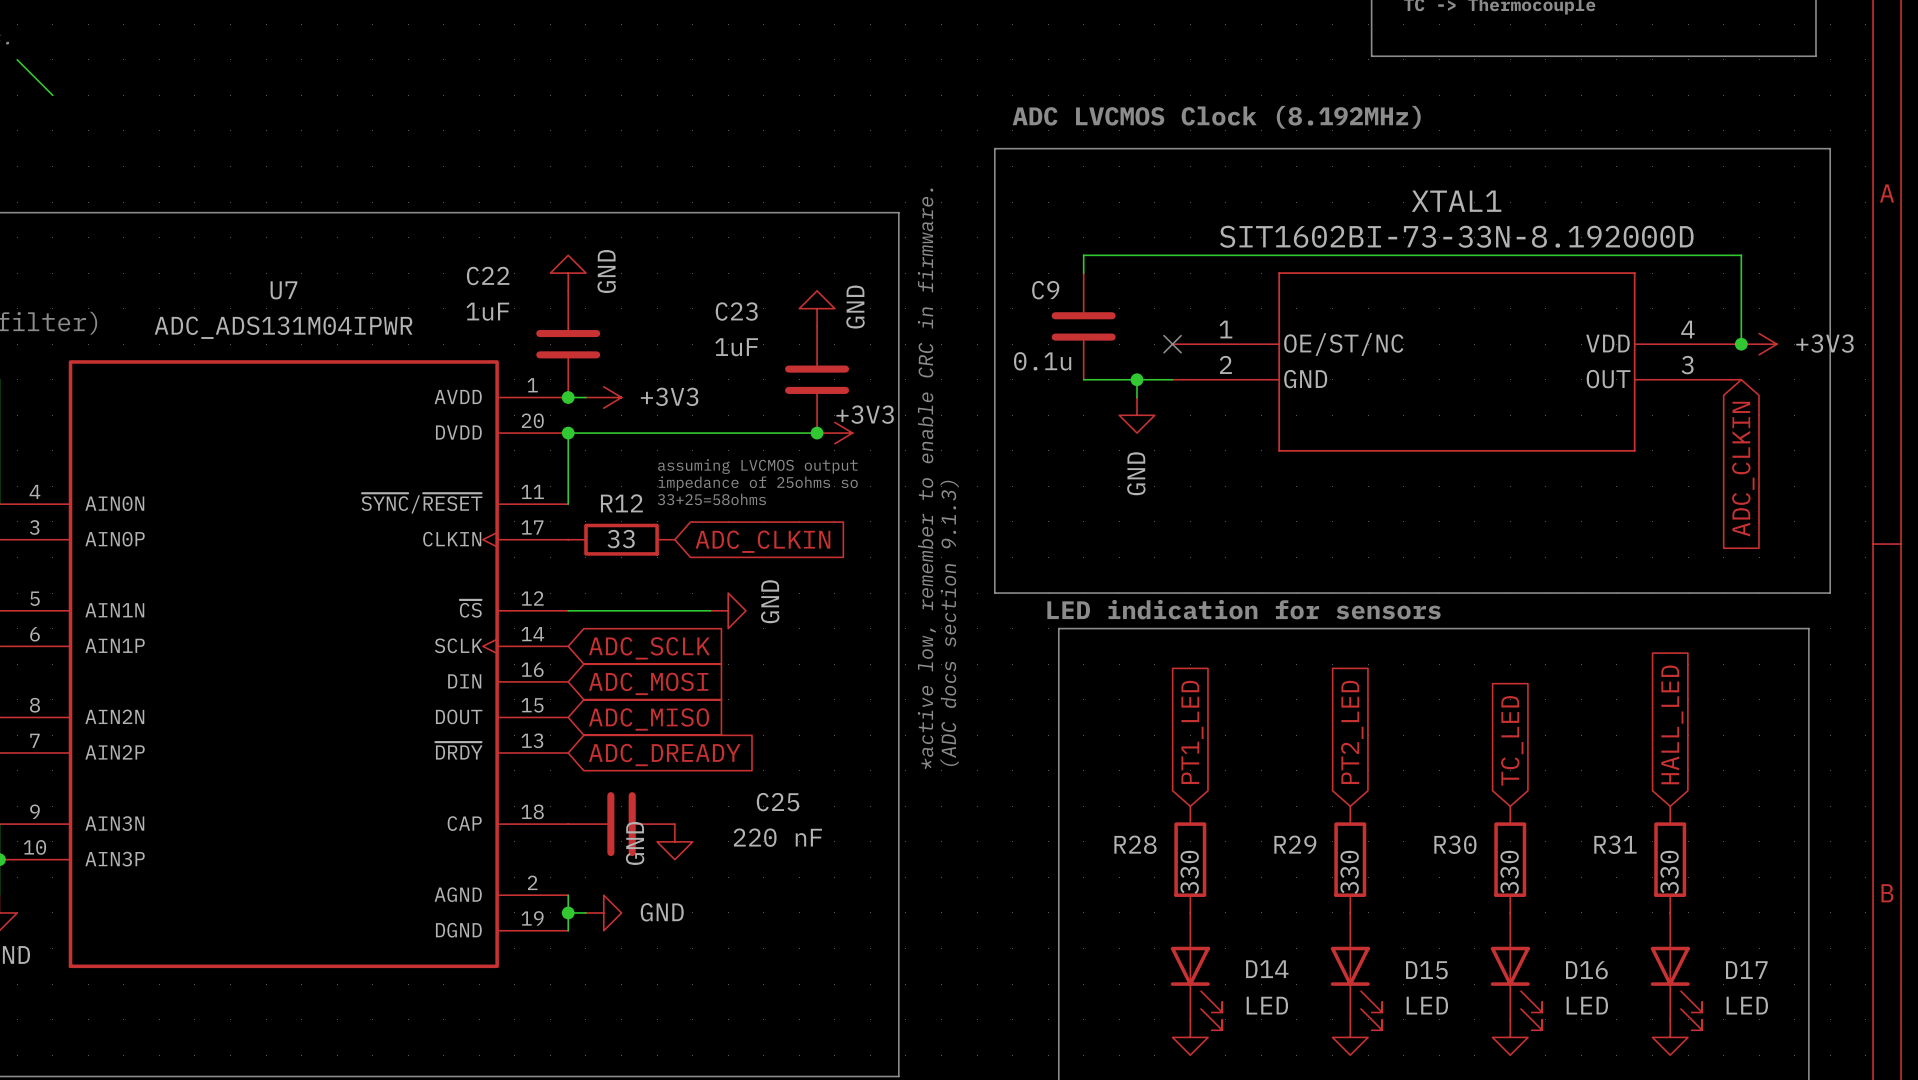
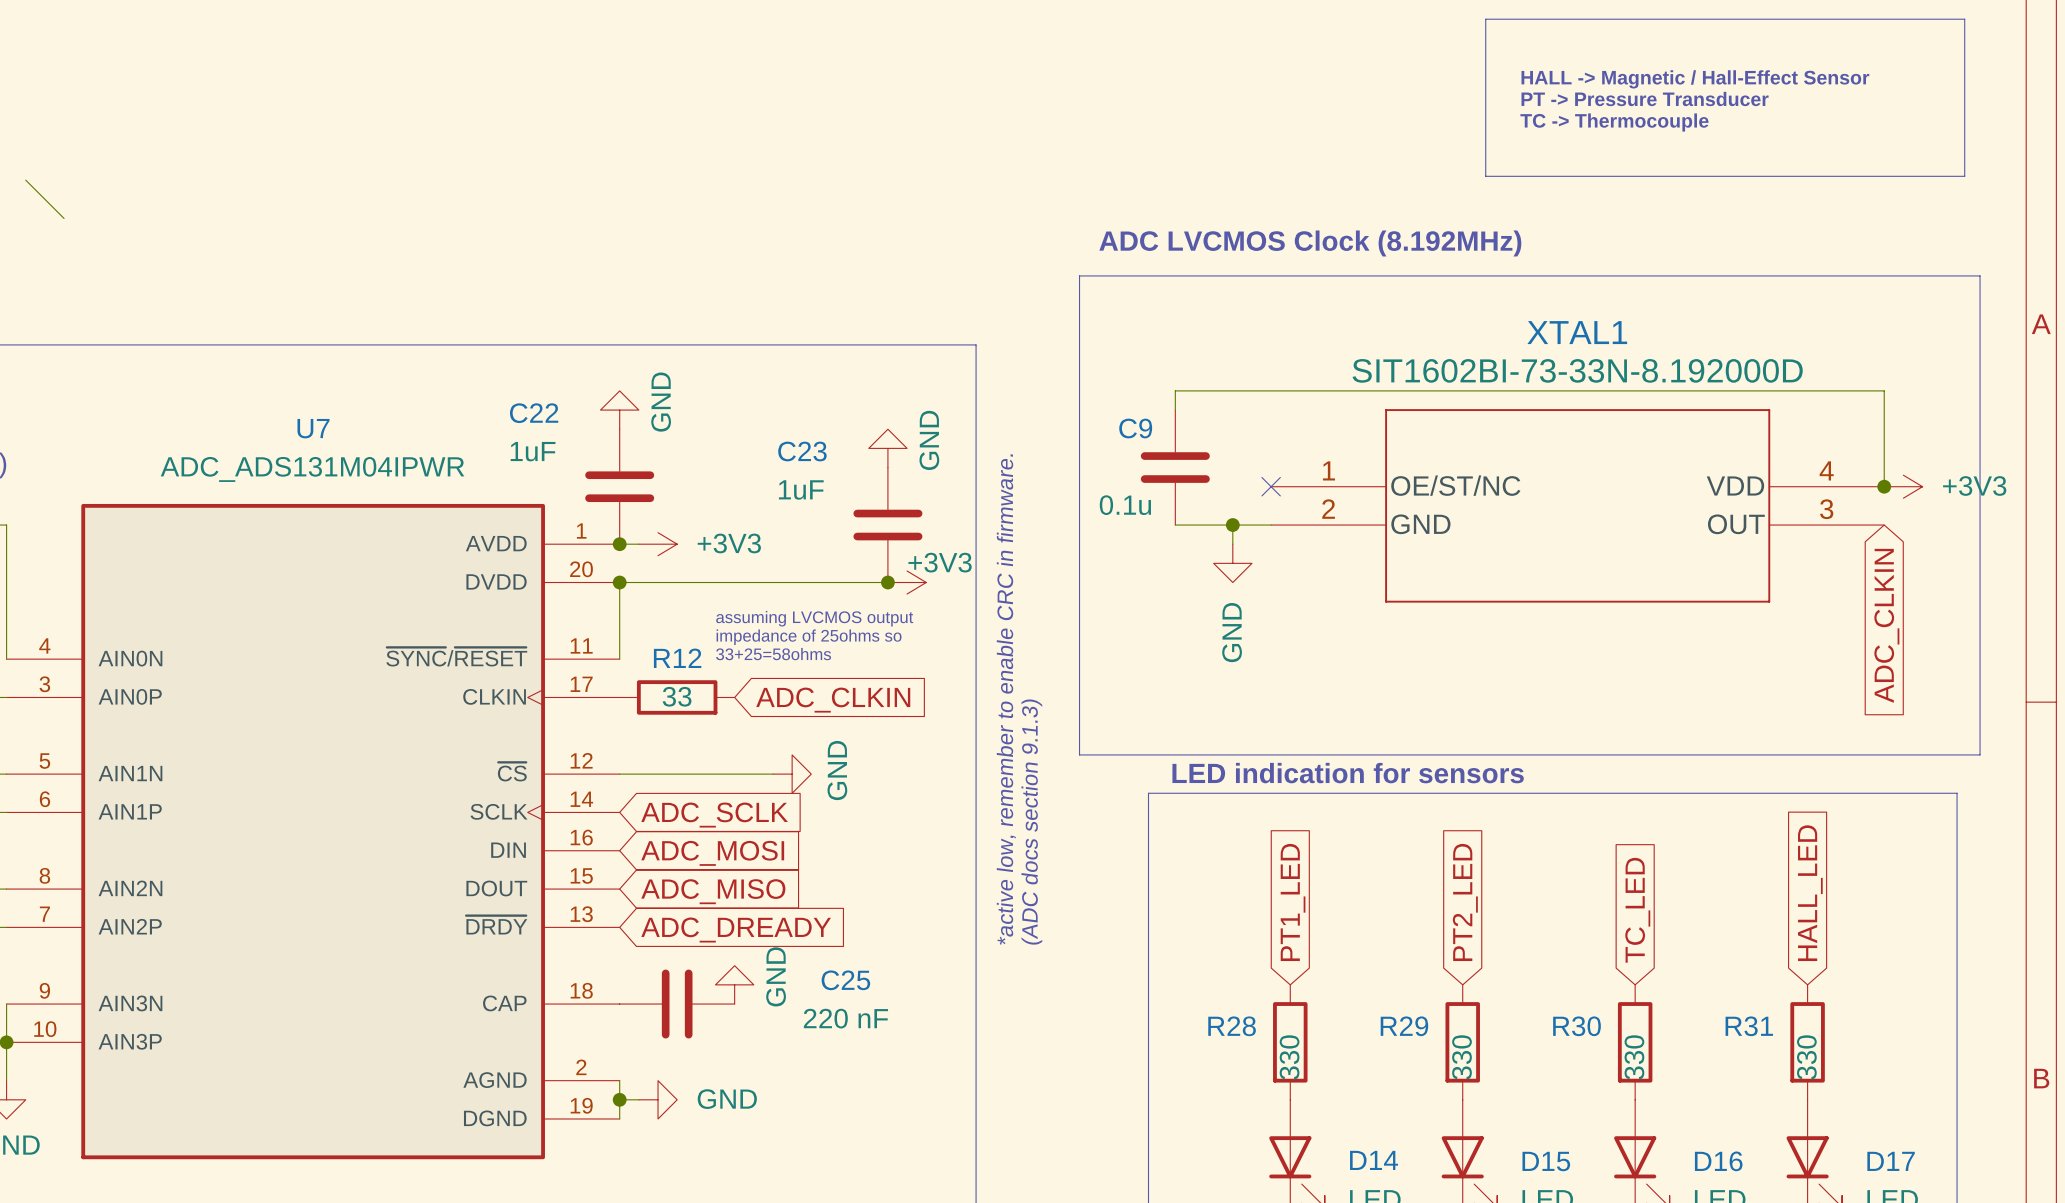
power symbol rotation: 0° (674, 841) -> 180° (734, 984)
power symbol position: GND (674, 841) -> GND (734, 984)

